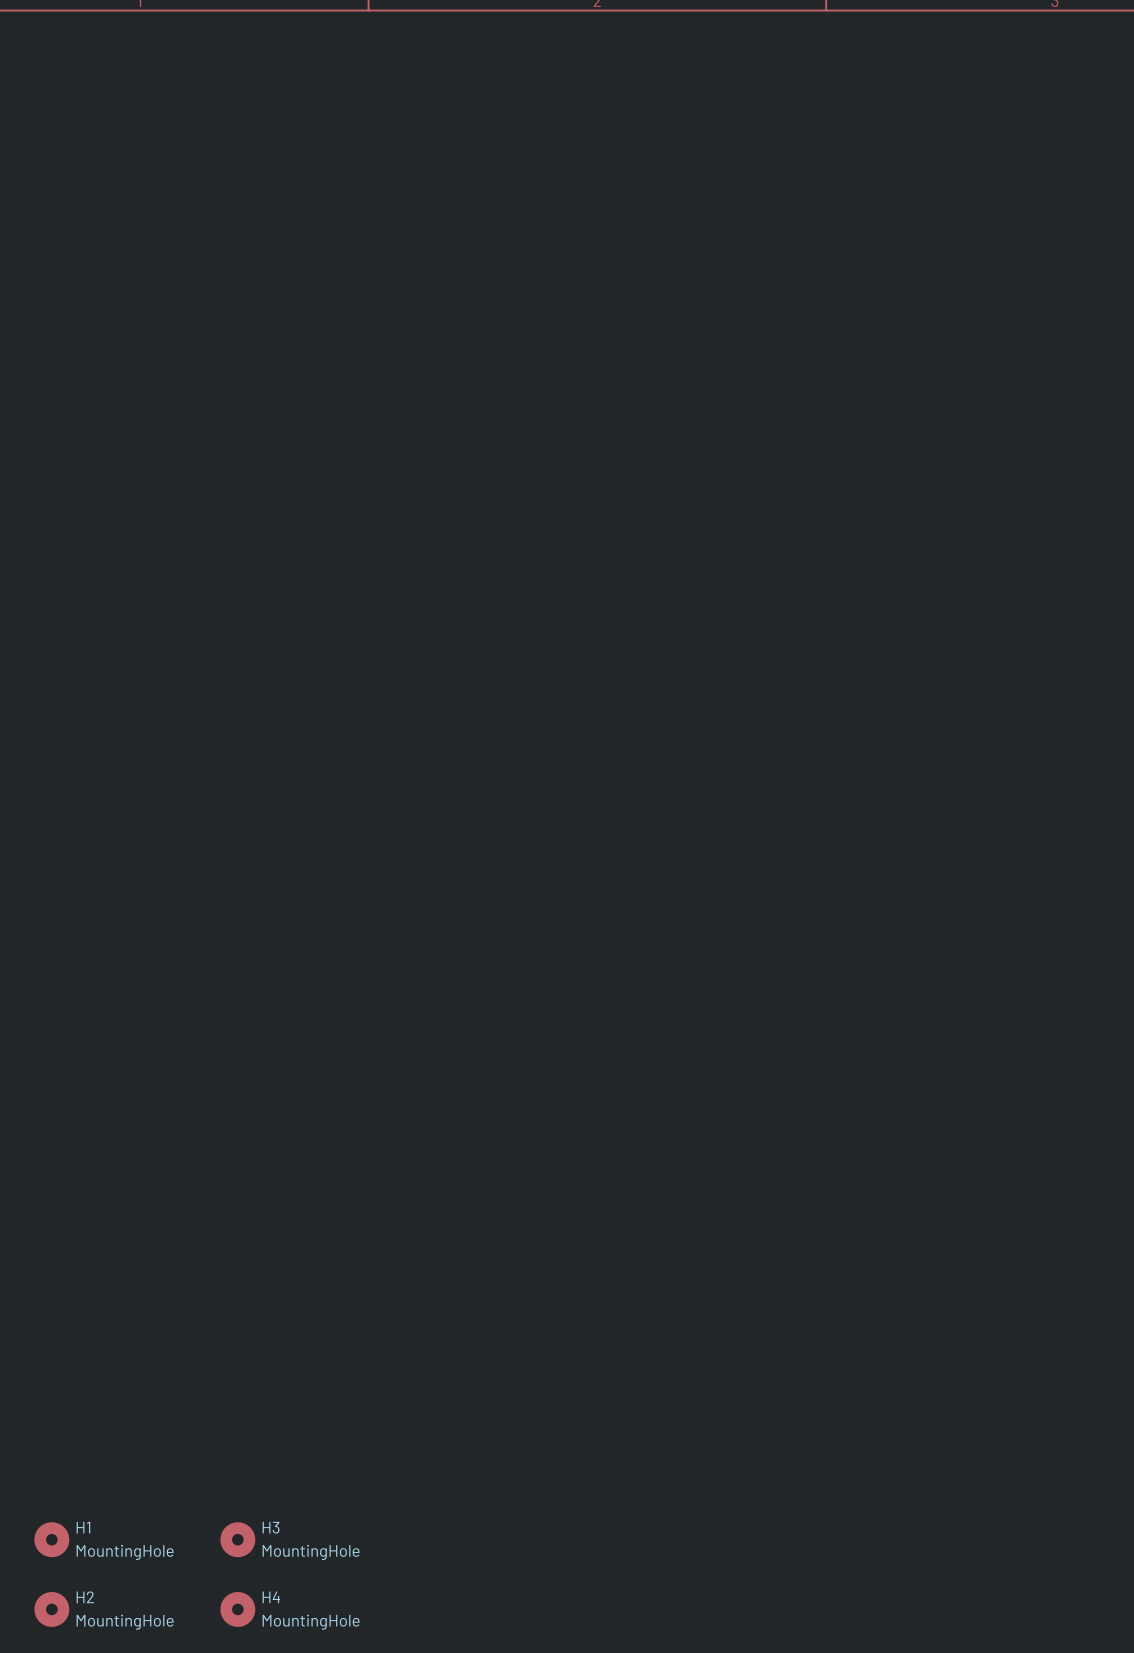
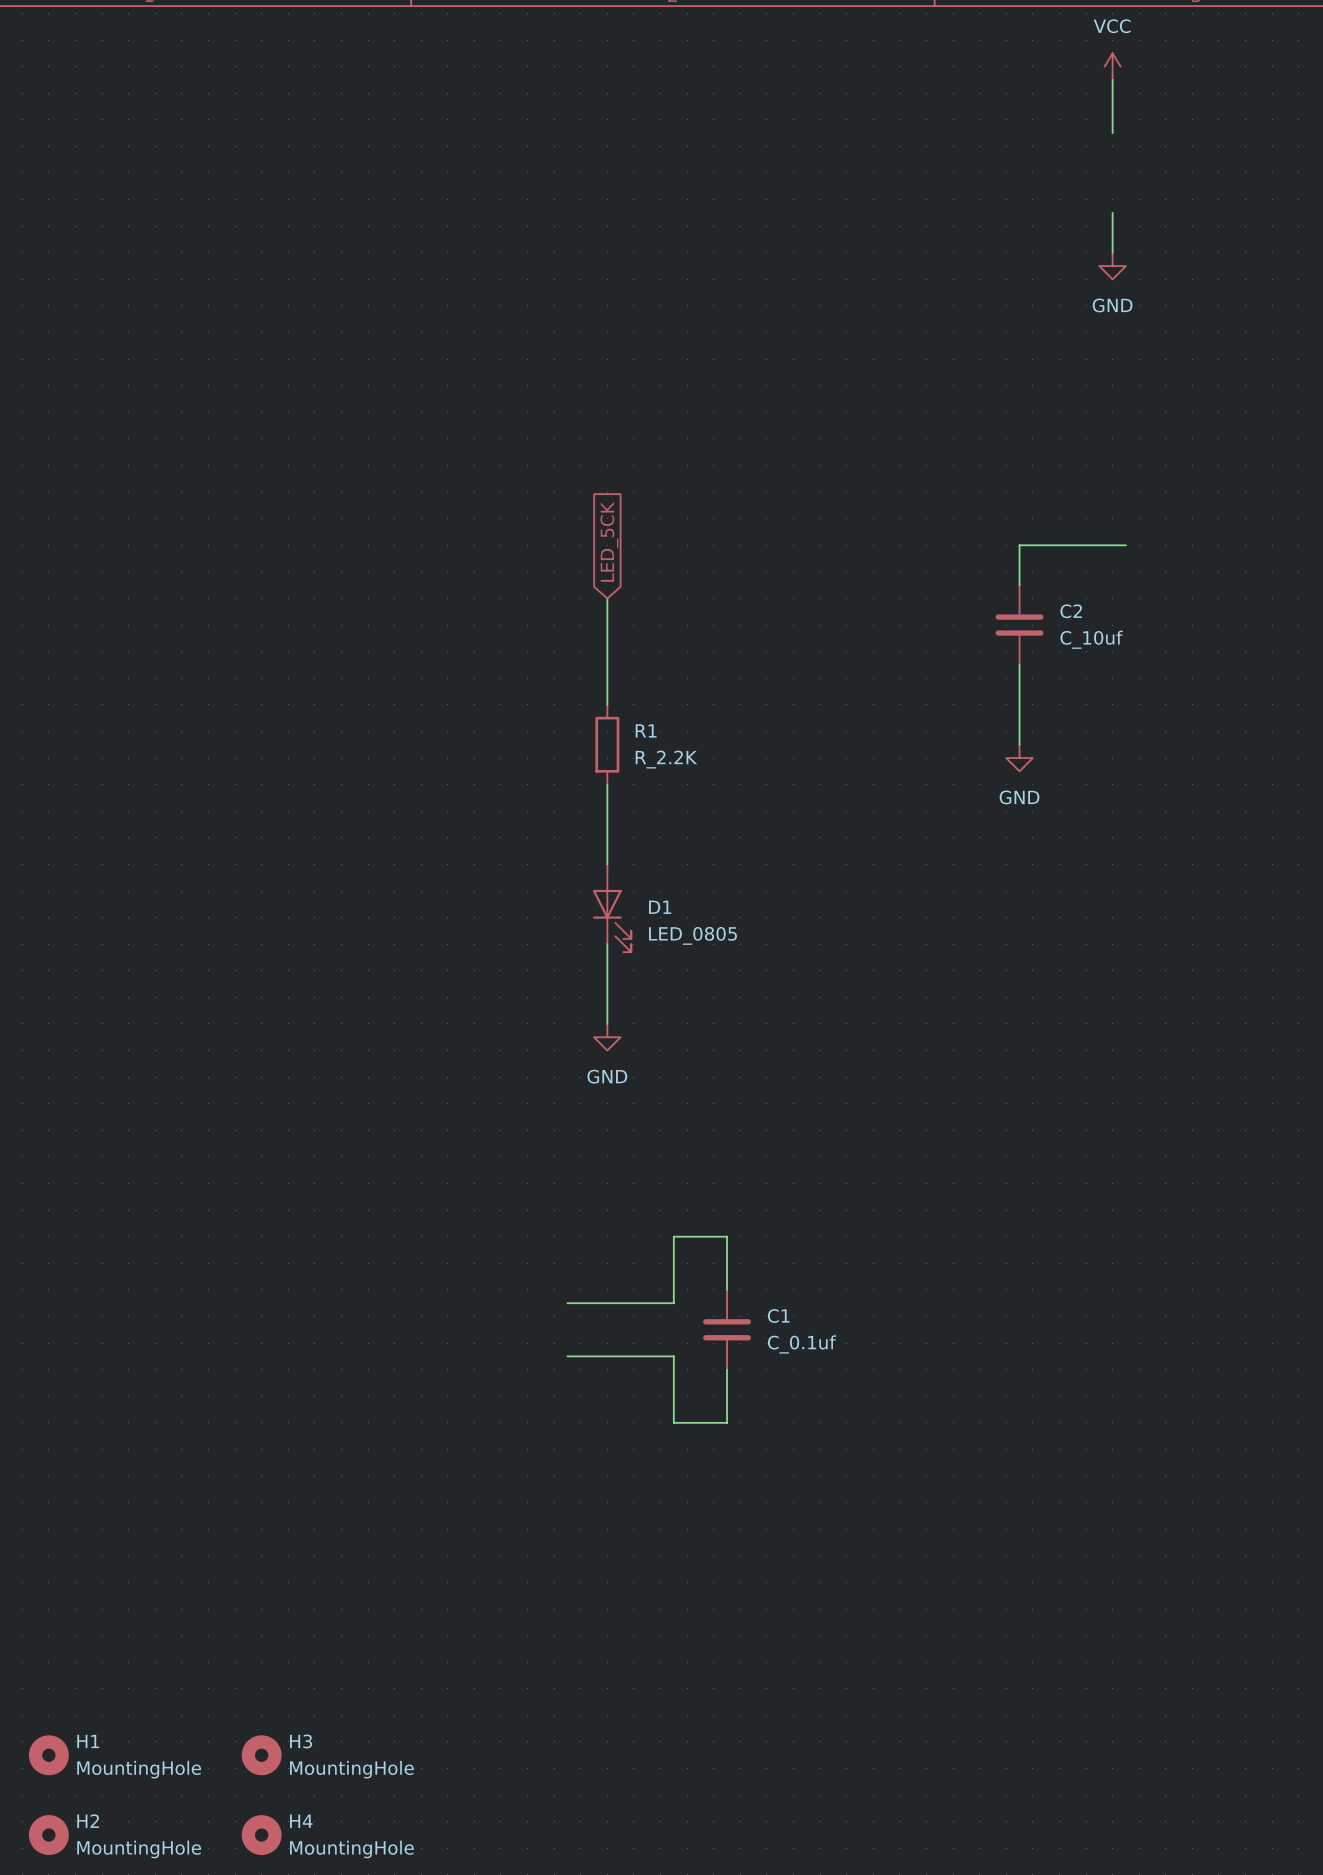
power symbol: none -> VCC (1112, 66)
wire: none -> (1112, 79) (1112, 133)
wire: none -> (1112, 212) (1112, 252)
power symbol: none -> GND (1112, 266)
global label: none -> LED_5CK (609, 541)
wire: none -> (1125, 545) (1019, 545) (1019, 585)
wire: none -> (607, 598) (607, 704)
C2: none -> C_10uf (1019, 625)
wire: none -> (1019, 664) (1019, 744)
R1: none -> R_2.2K (607, 744)
power symbol: none -> GND (1019, 758)
wire: none -> (607, 784) (607, 864)
D1: none -> LED_0805 (612, 908)
wire: none -> (607, 944) (607, 1023)
power symbol: none -> GND (607, 1037)
wire: none -> (727, 1289) (727, 1236) (673, 1236) (673, 1303) (567, 1303)
C1: none -> C_0.1uf (727, 1329)
wire: none -> (567, 1356) (673, 1356) (673, 1422) (727, 1422) (727, 1369)

